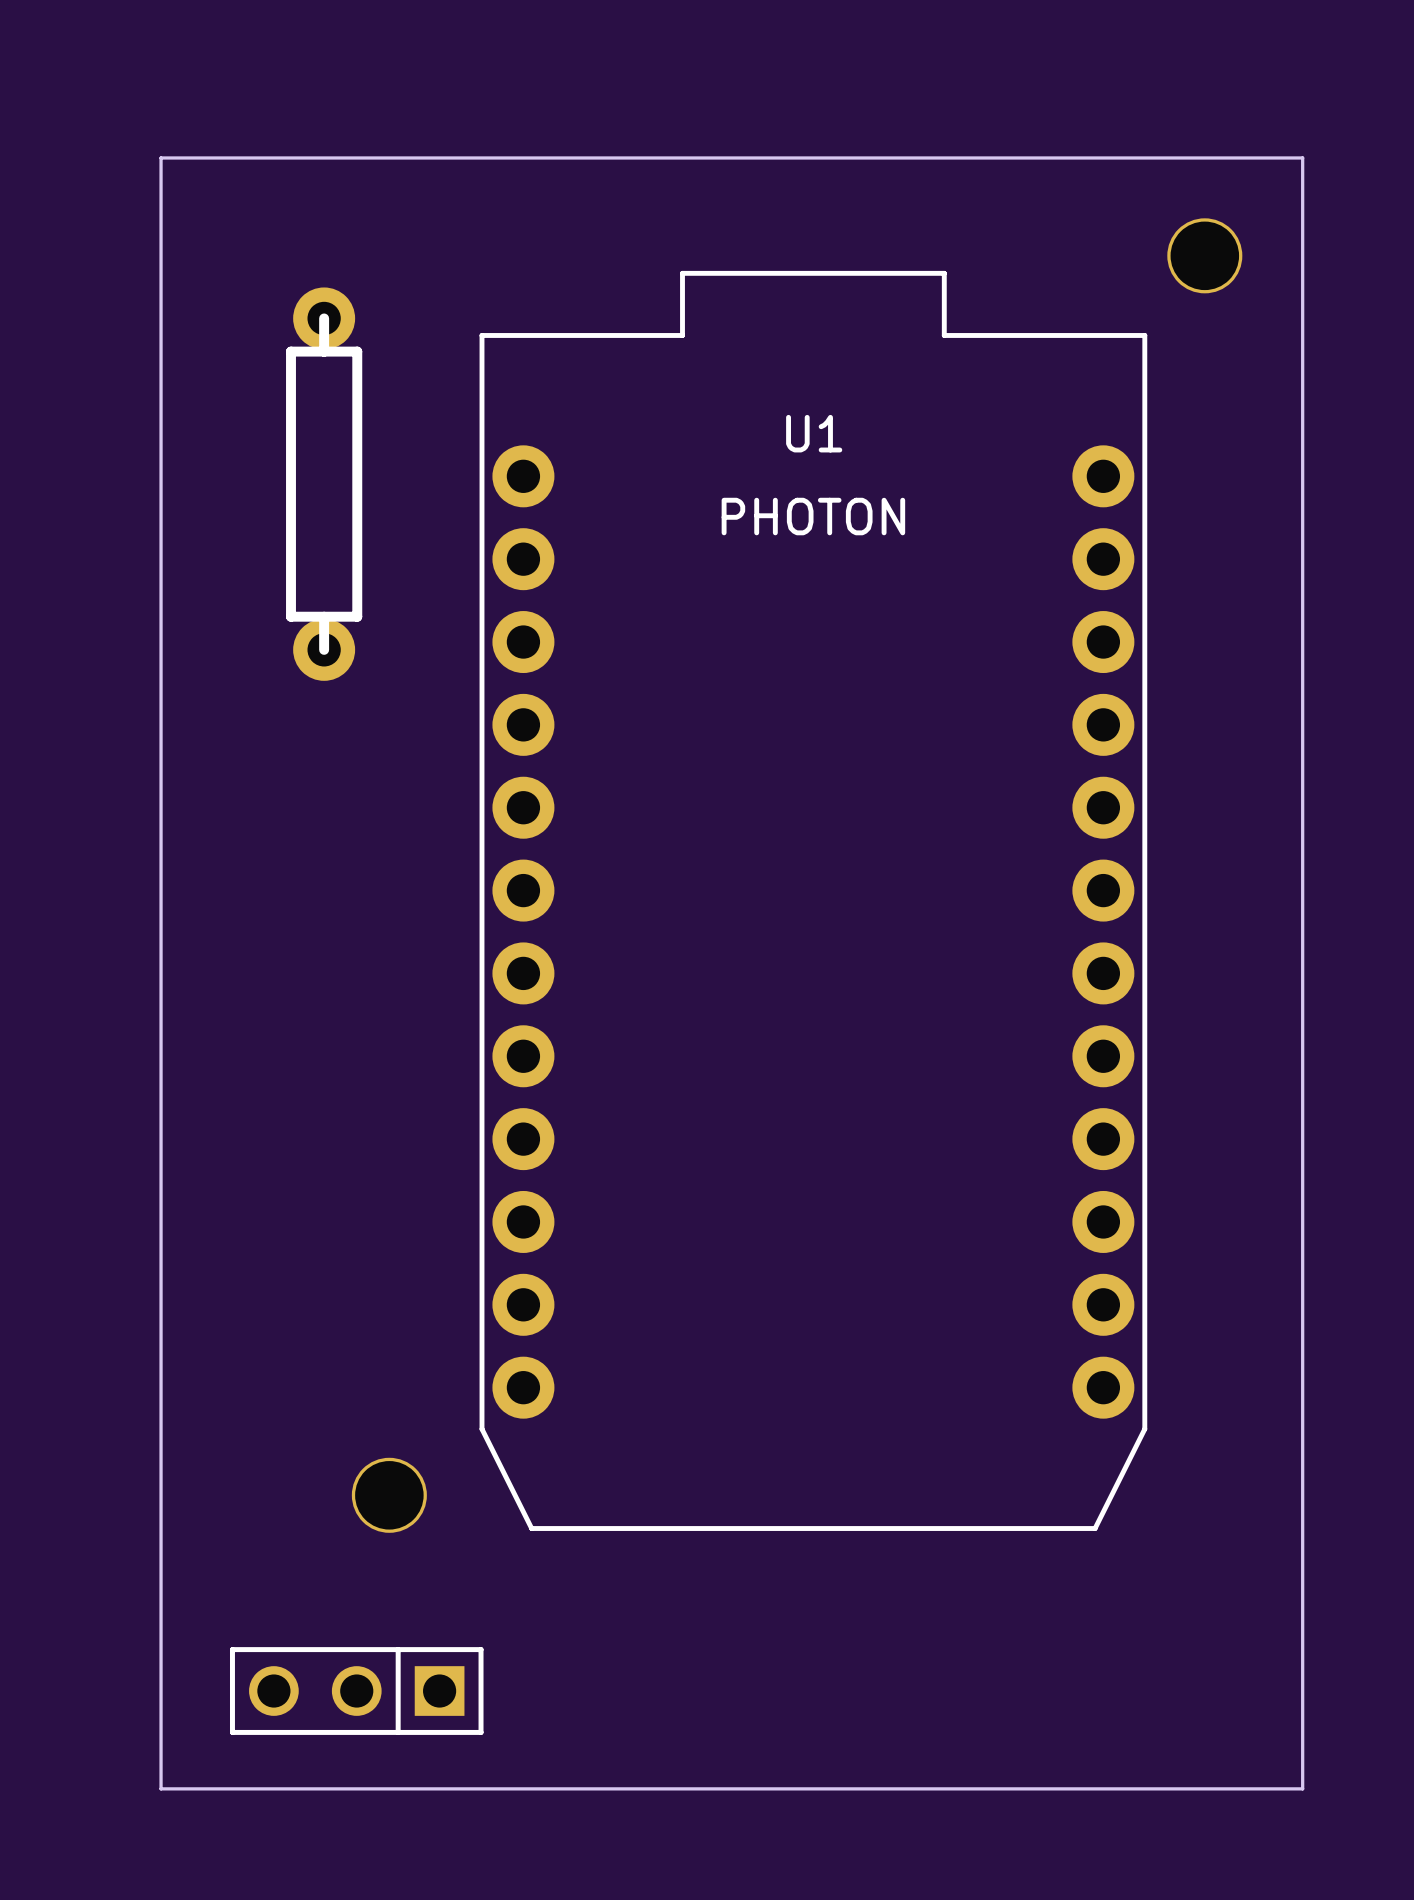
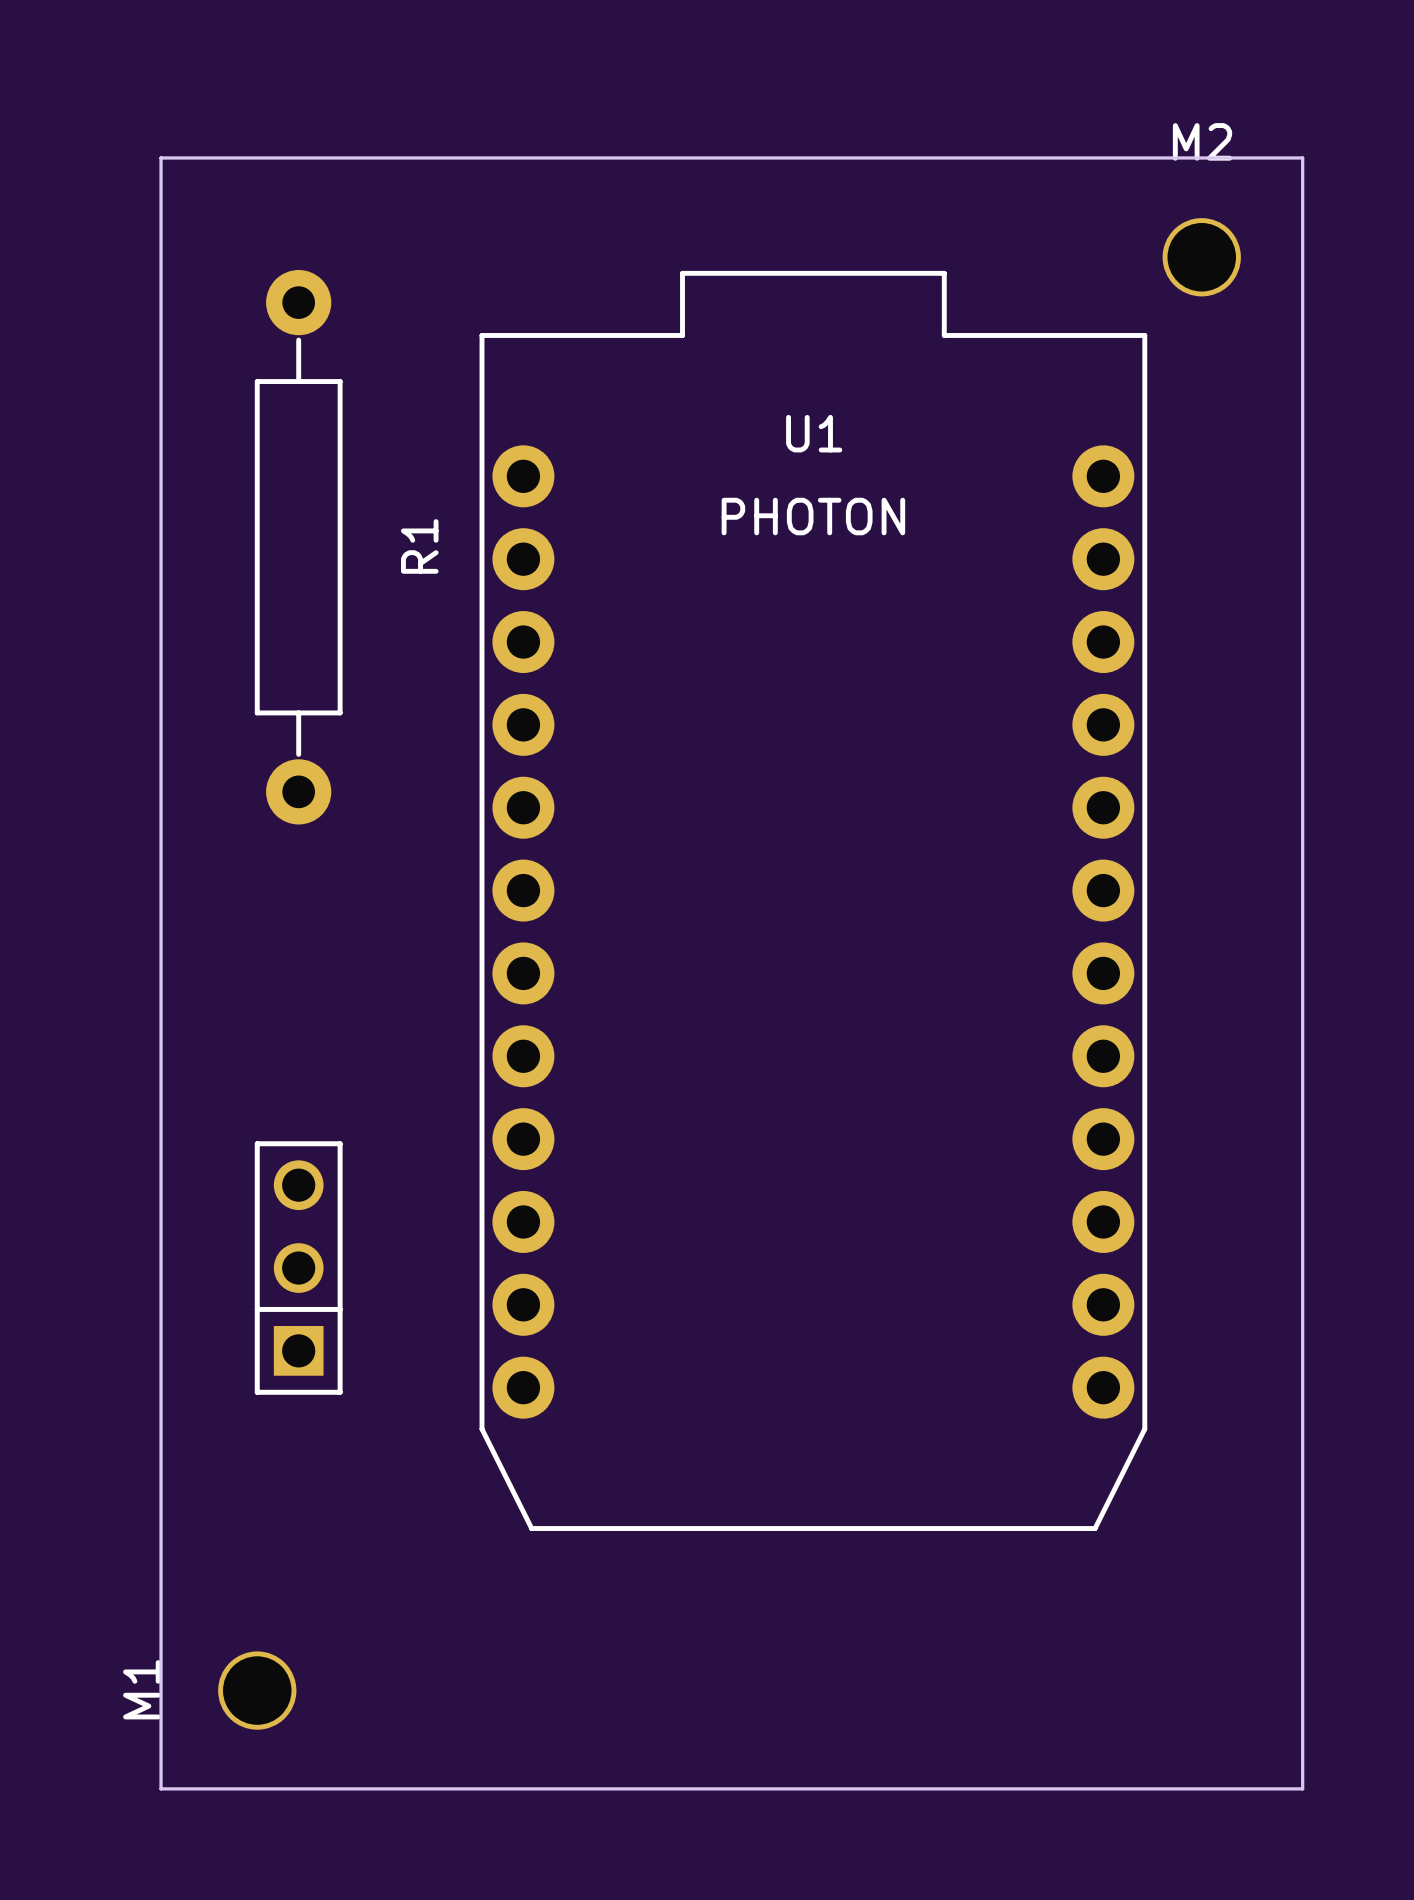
part: (1204, 255) -> none
M2: none -> (1201, 257)
part: (324, 484) -> none
R1: none -> (298, 547)
part: (389, 1495) -> none
M1: none -> (257, 1690)
part rotation: 0° (356, 1691) -> 90° clockwise (298, 1268)
part position: (356, 1691) -> (298, 1268)

